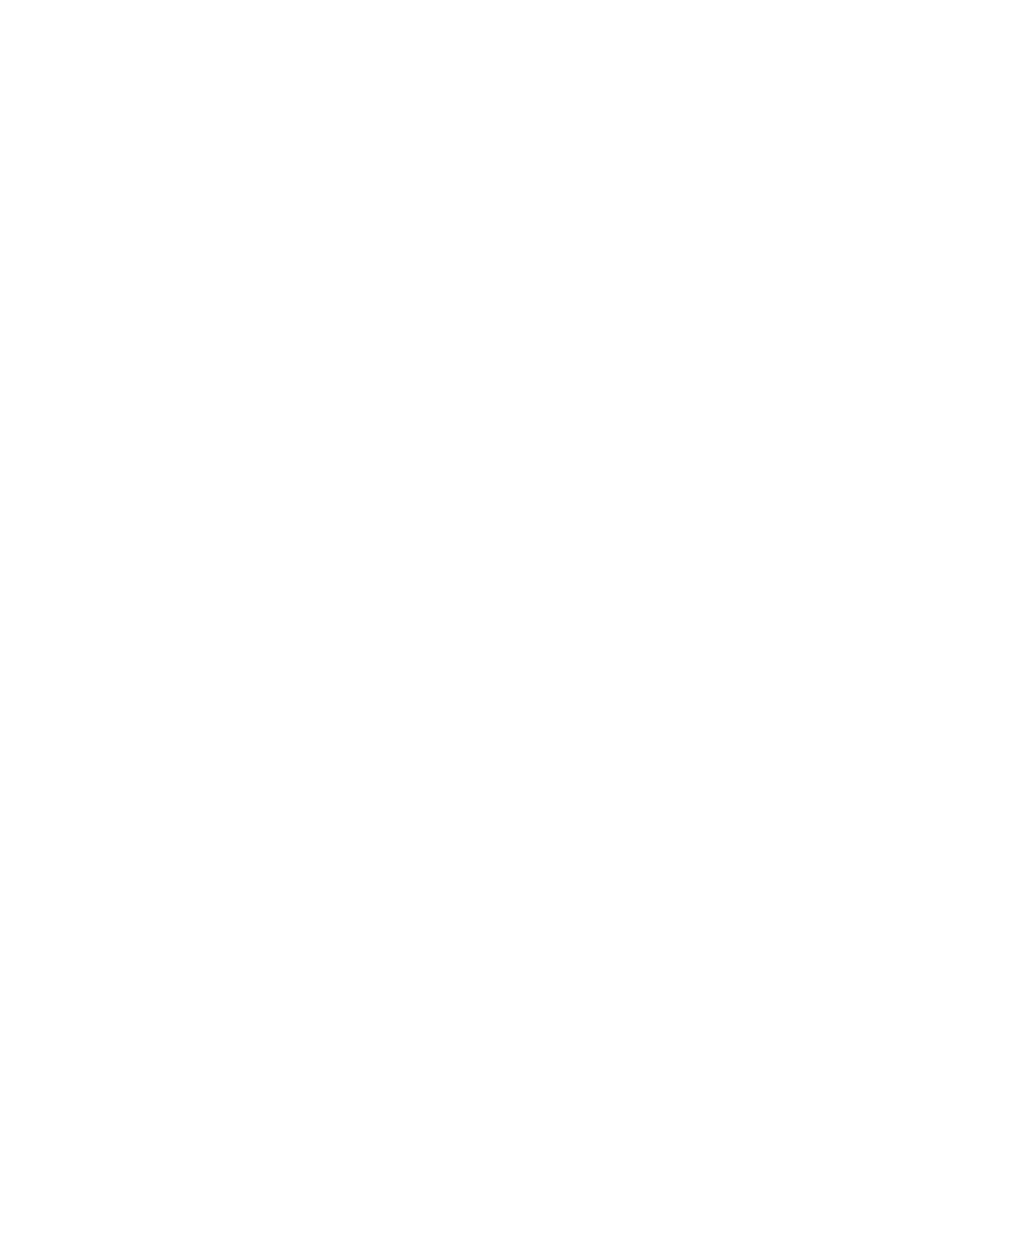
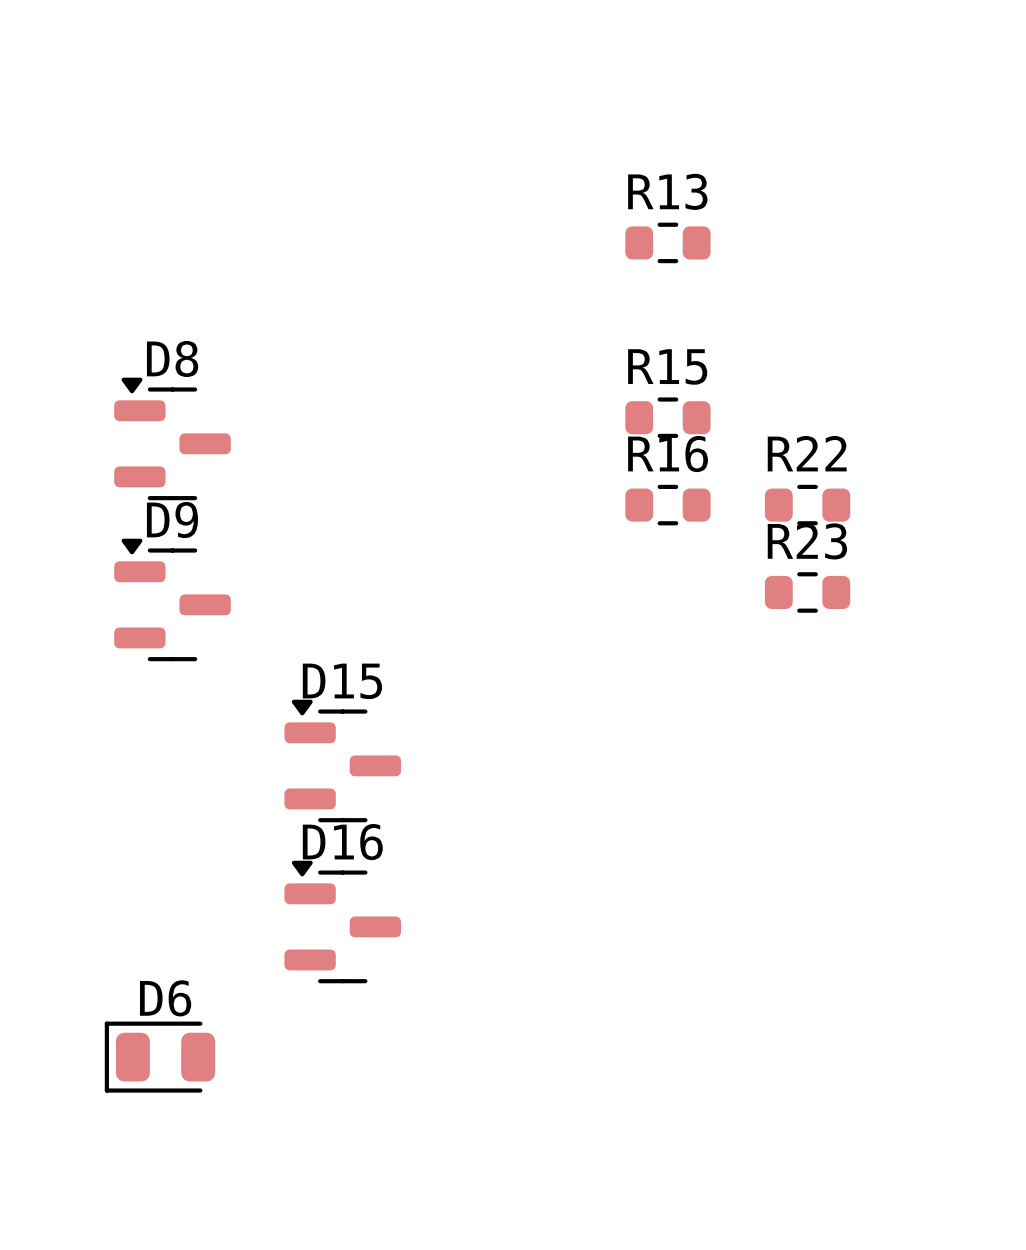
R13: none -> (667, 242)
R15: none -> (667, 417)
D8: none -> (172, 438)
R16: none -> (667, 505)
R22: none -> (807, 505)
R23: none -> (807, 592)
D9: none -> (172, 599)
D15: none -> (342, 760)
D16: none -> (342, 922)
D6: none -> (159, 1057)

